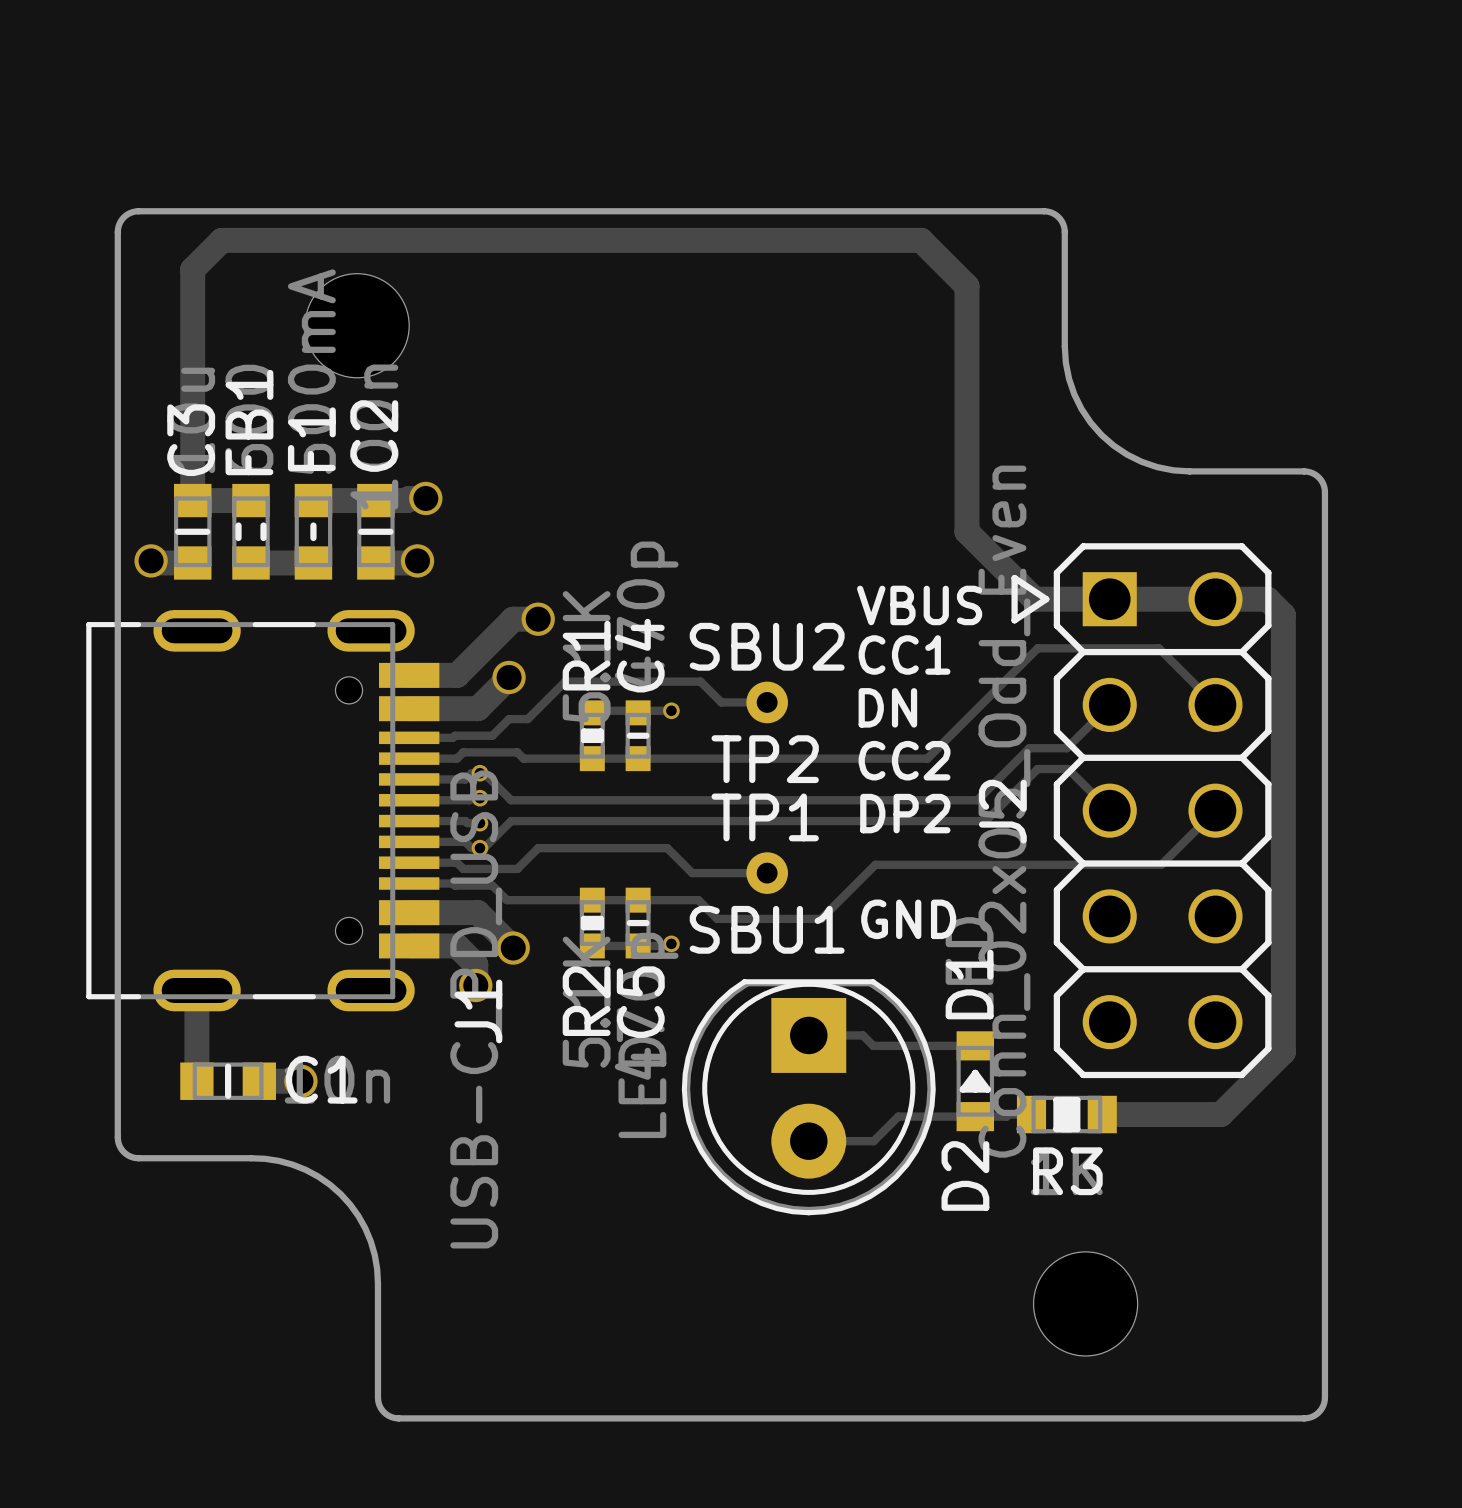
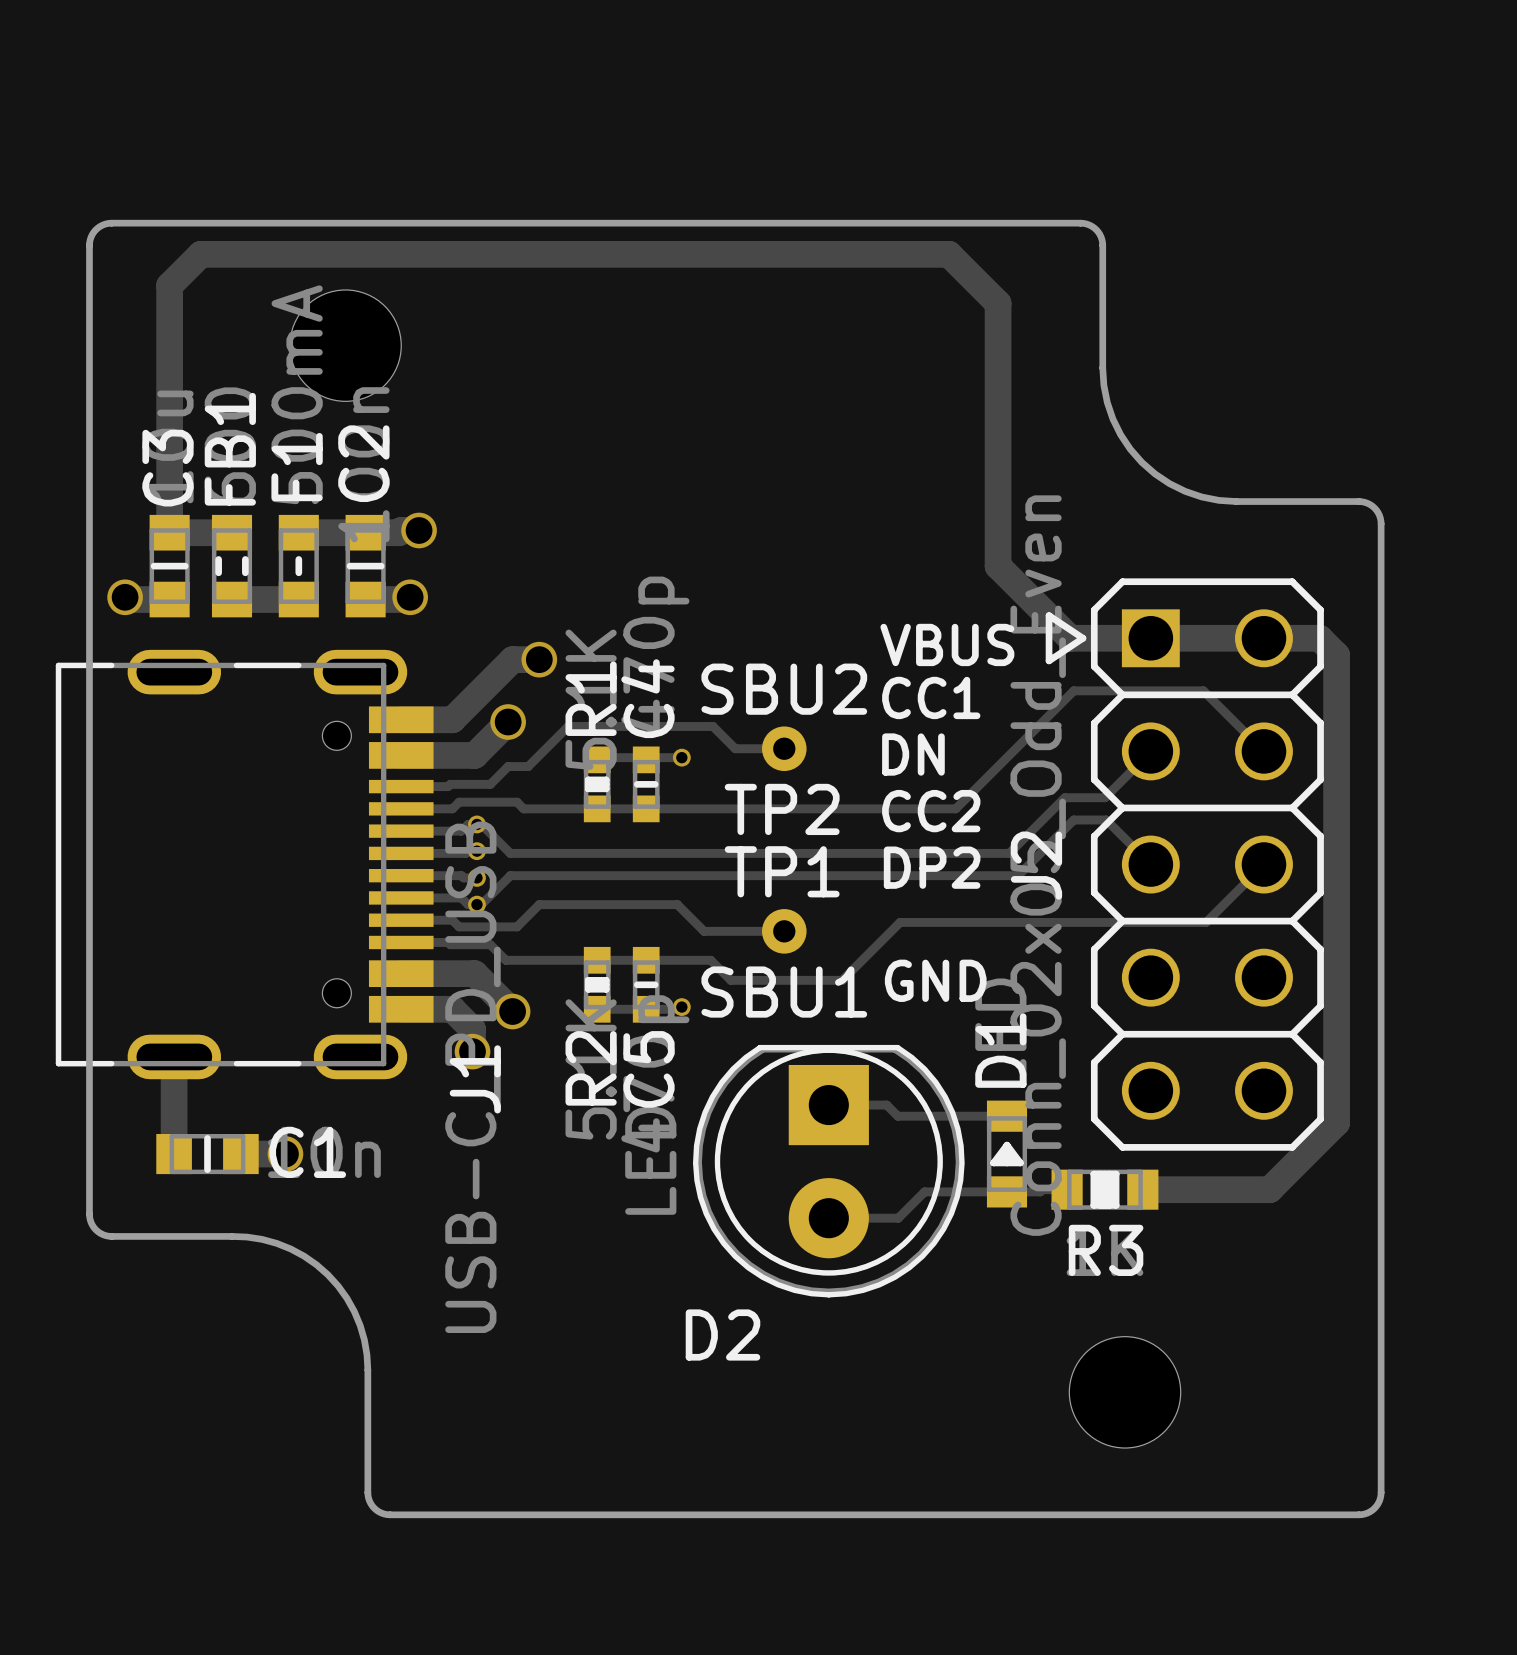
D2 name rotation: 0° (965, 1175) -> 90° clockwise (722, 1334)
D2 name position: D2 (965, 1175) -> D2 (722, 1334)

